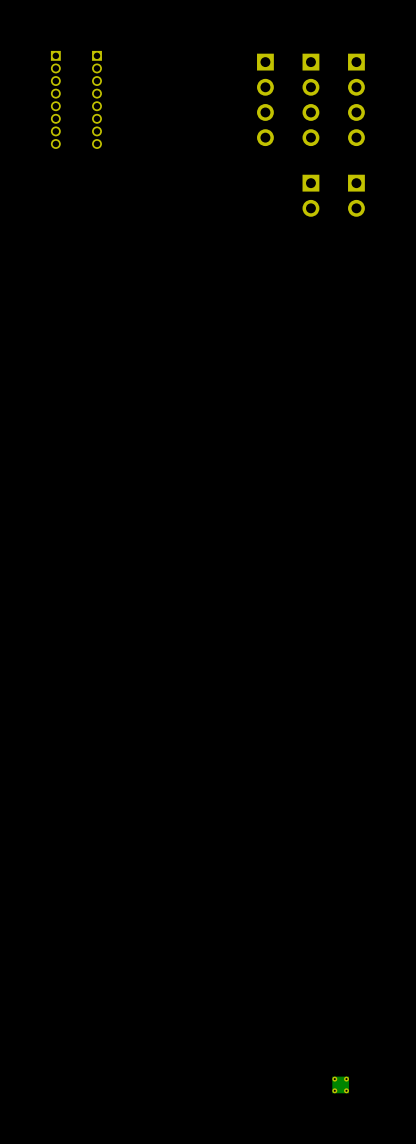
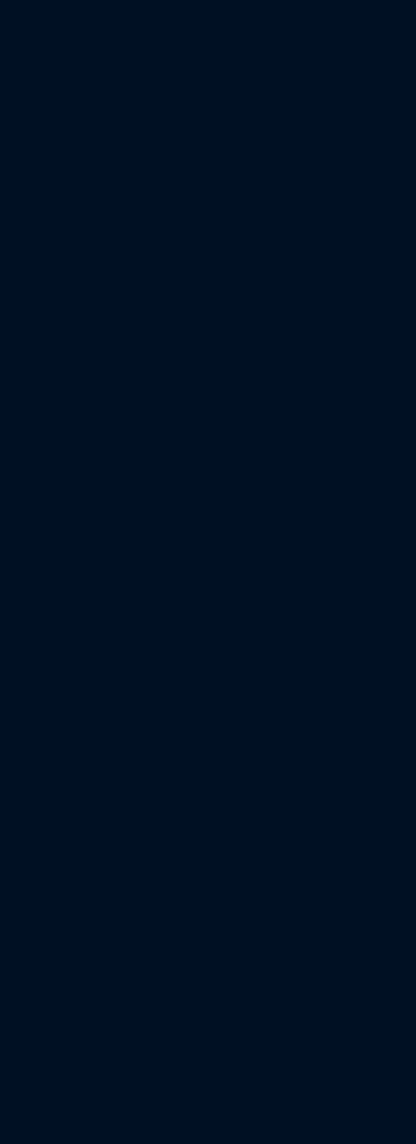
part: (55, 99) -> none
part: (97, 99) -> none
part: (265, 99) -> none
part: (310, 99) -> none
part: (356, 99) -> none
part: (310, 195) -> none
part: (356, 195) -> none
part: (340, 1084) -> none

